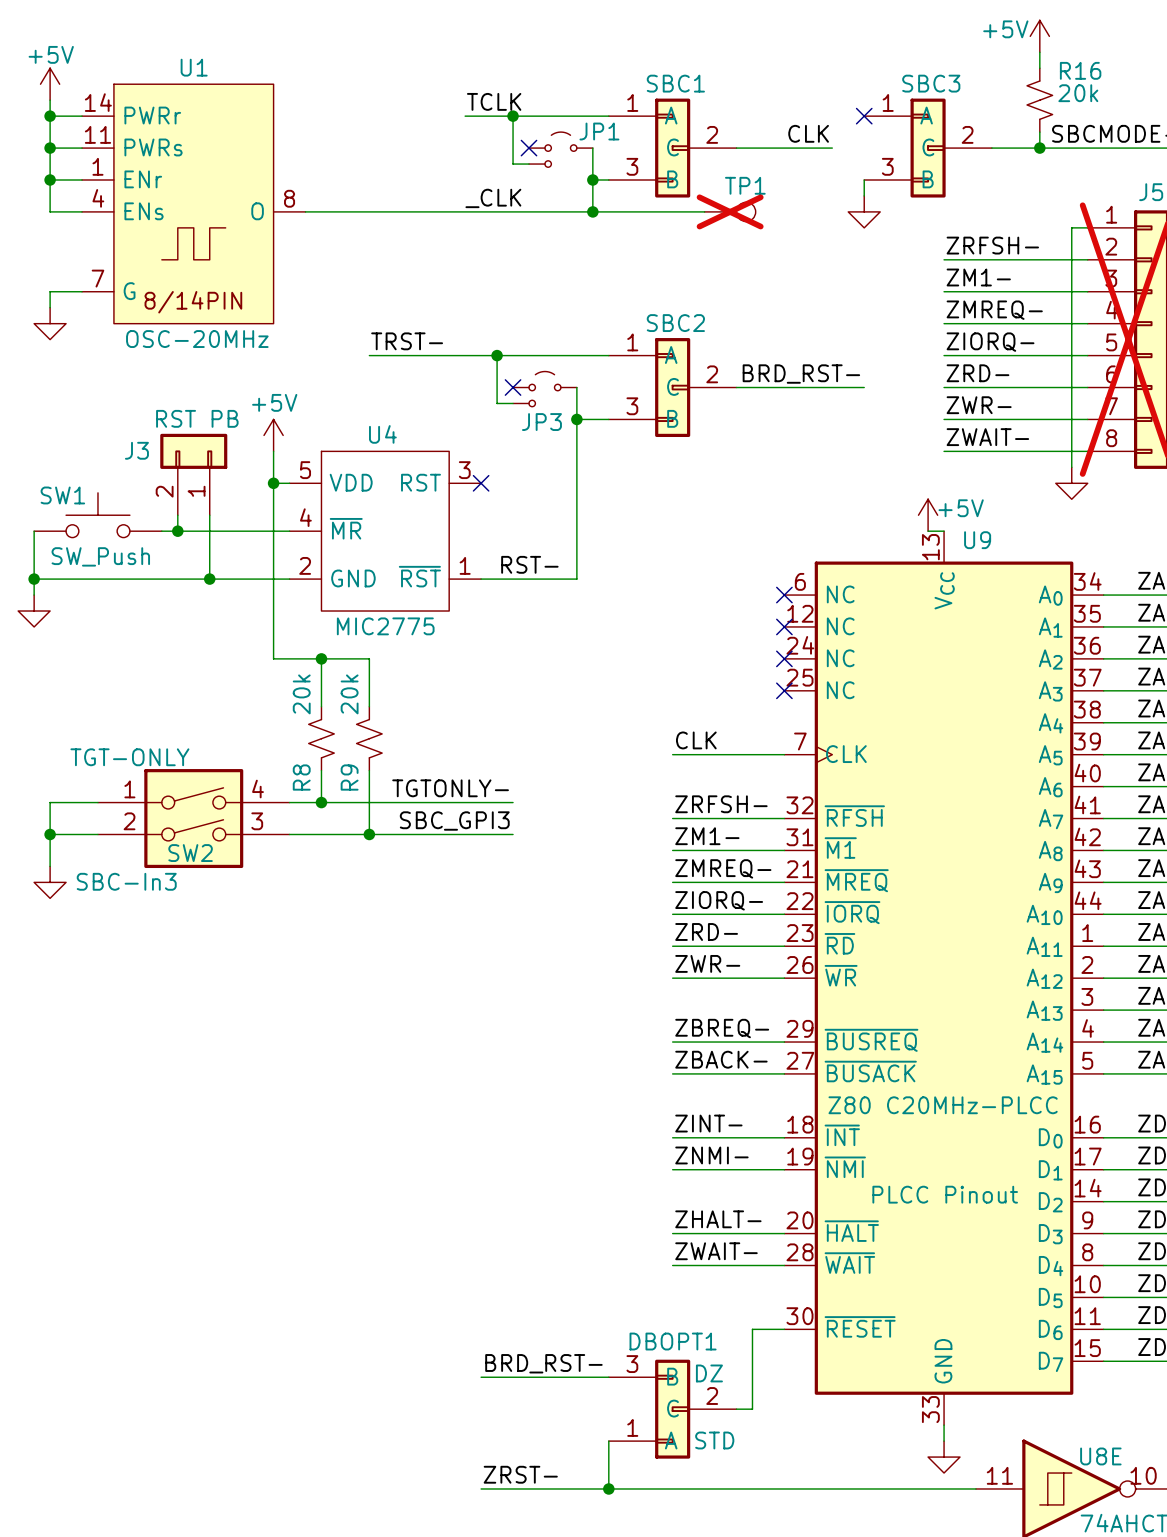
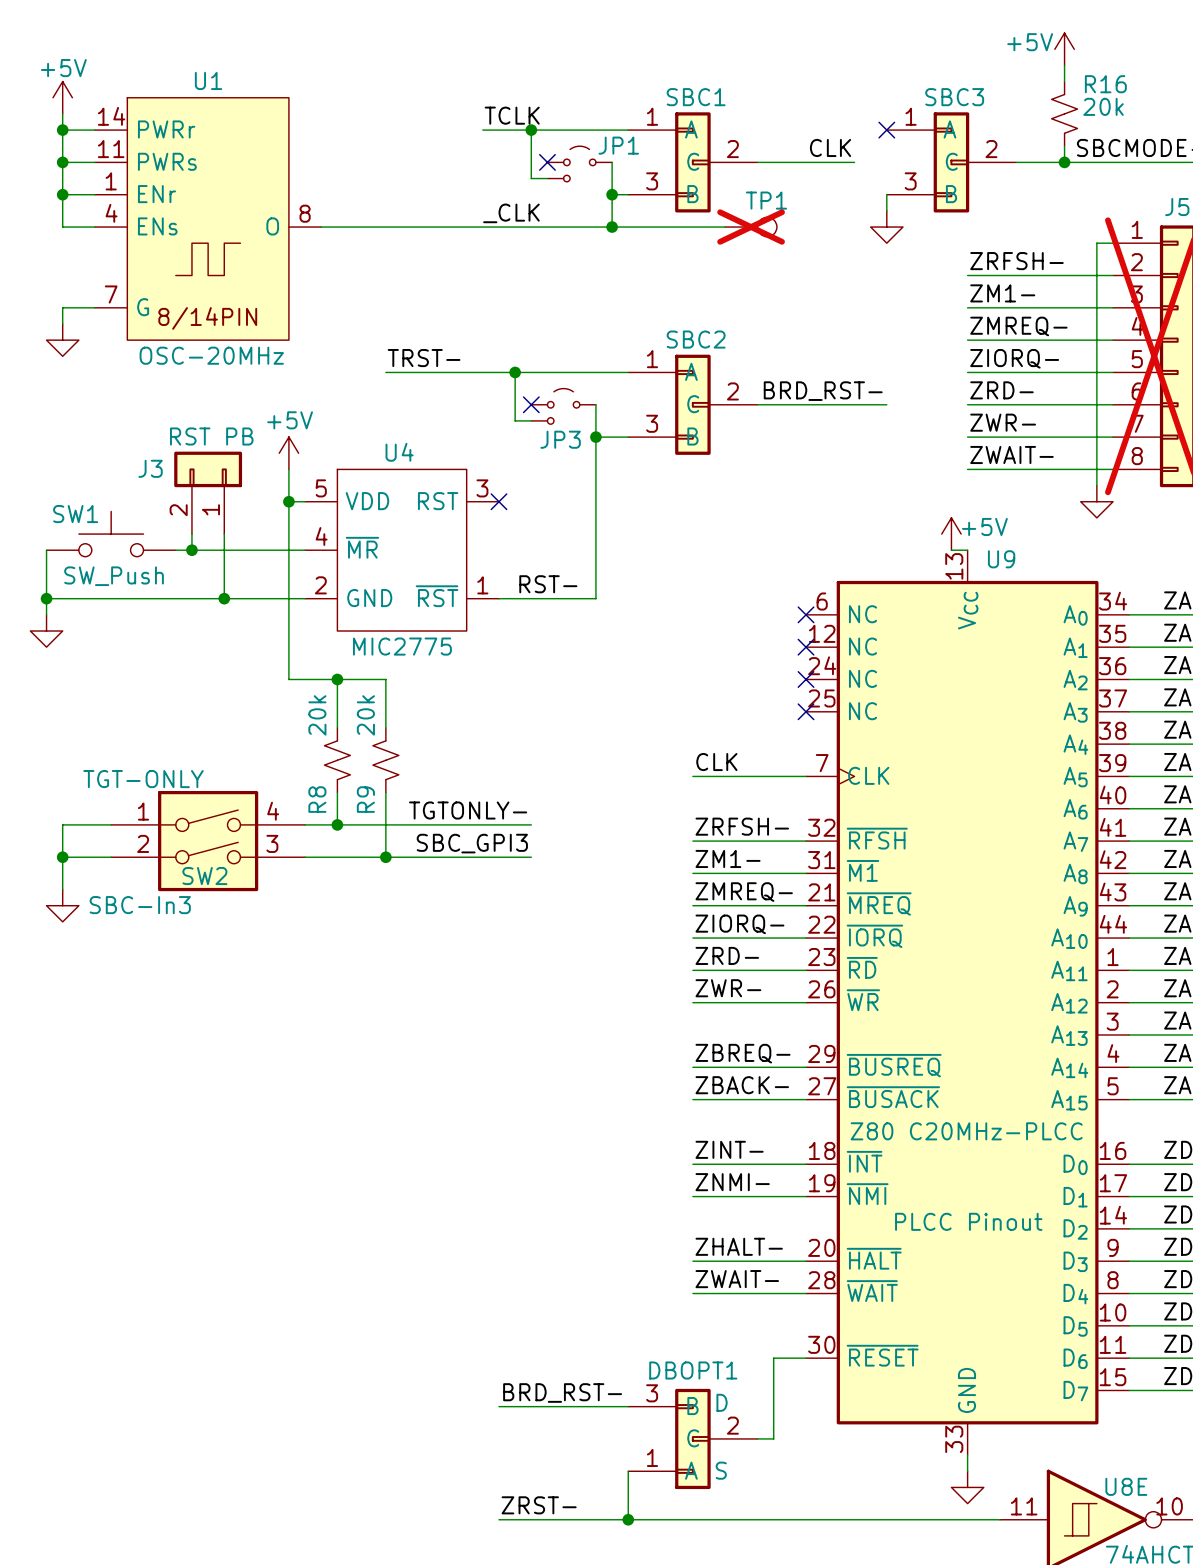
DBOPT1 text: DZ (709, 1373) -> D (722, 1402)
DBOPT1 text: STD (714, 1440) -> S (721, 1470)

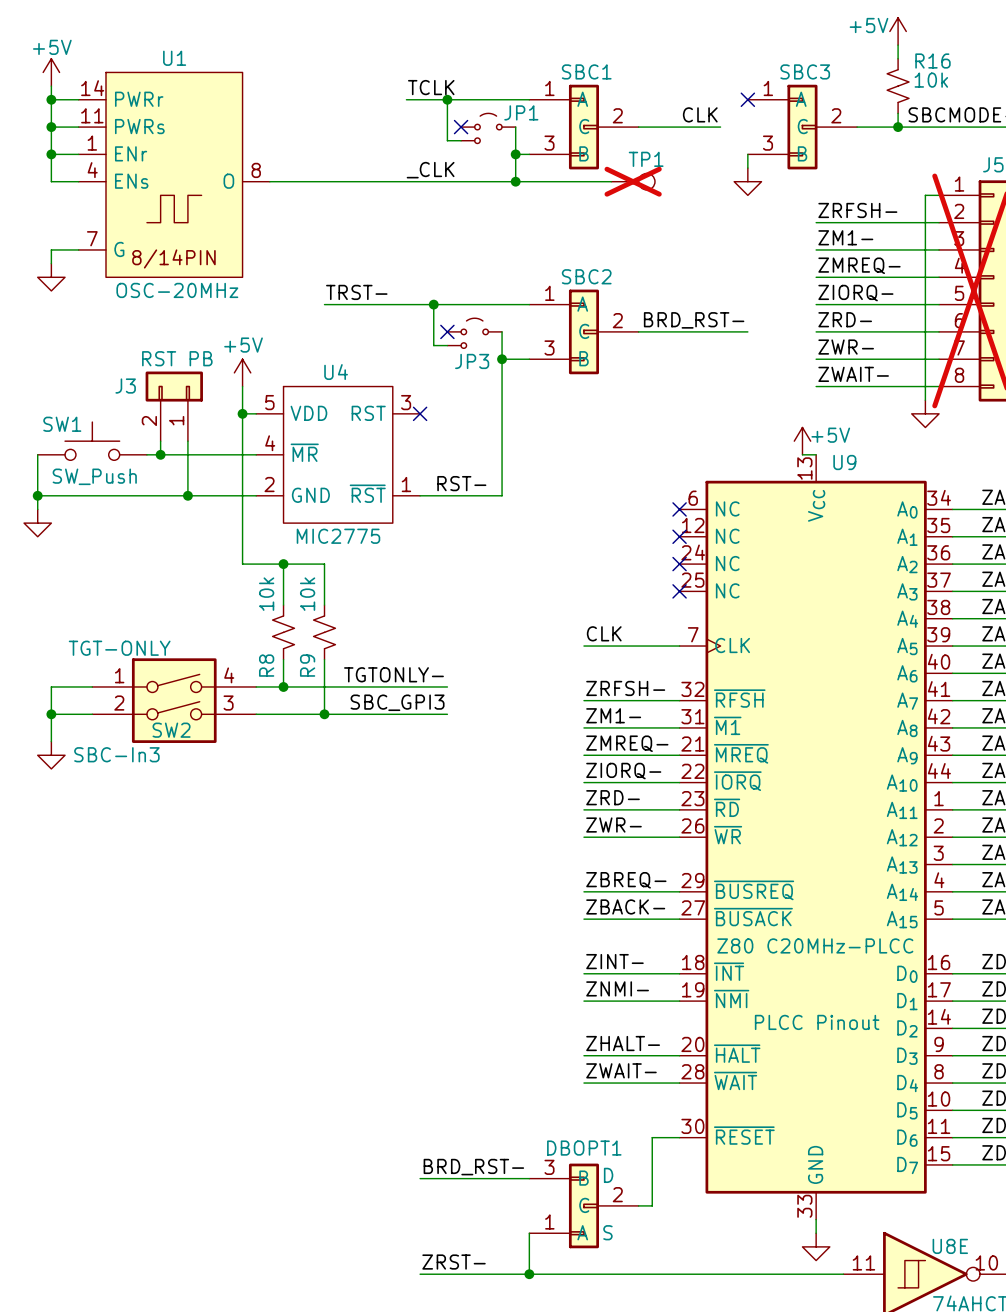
R16 value: 20k (1103, 106) -> 10k (931, 80)
R8 value: 20k (317, 715) -> 10k (266, 594)
R9 value: 20k (365, 715) -> 10k (307, 594)

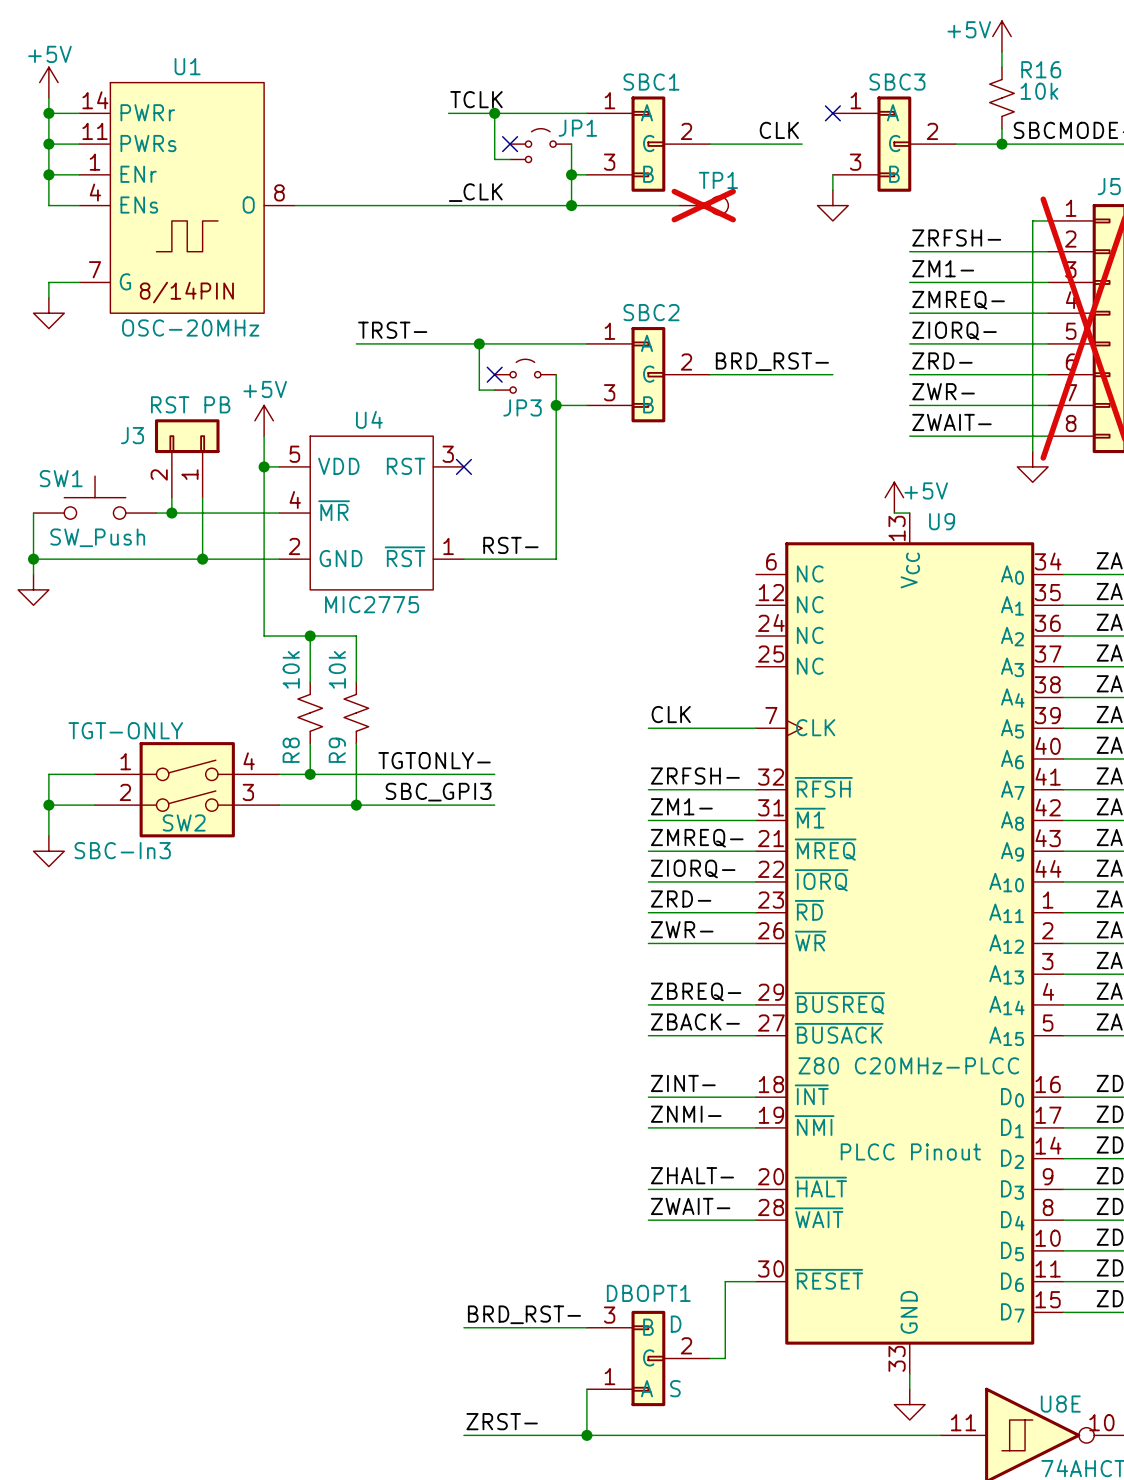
no-connect mark: (679, 509) -> none
no-connect mark: (679, 536) -> none
no-connect mark: (679, 564) -> none
no-connect mark: (679, 591) -> none

